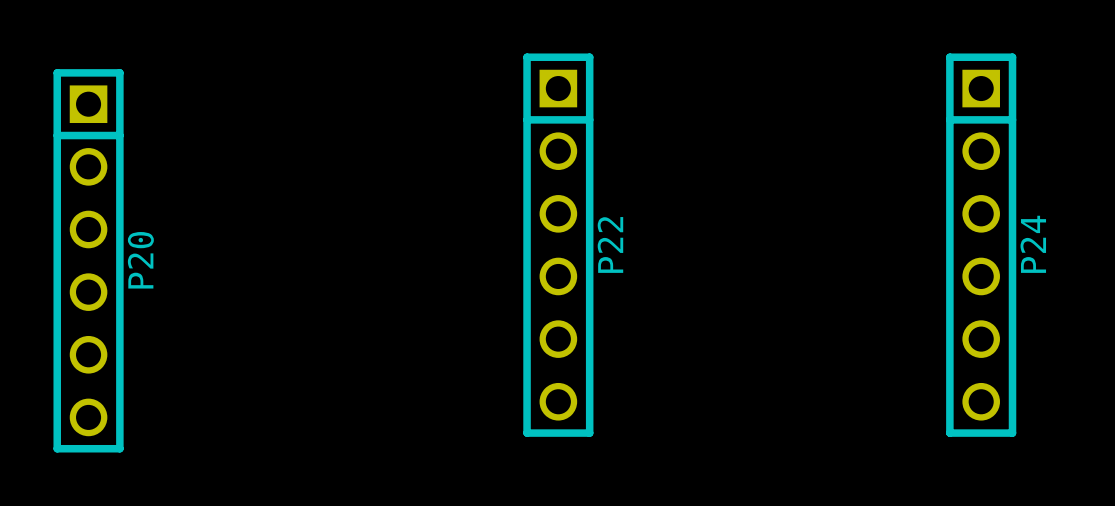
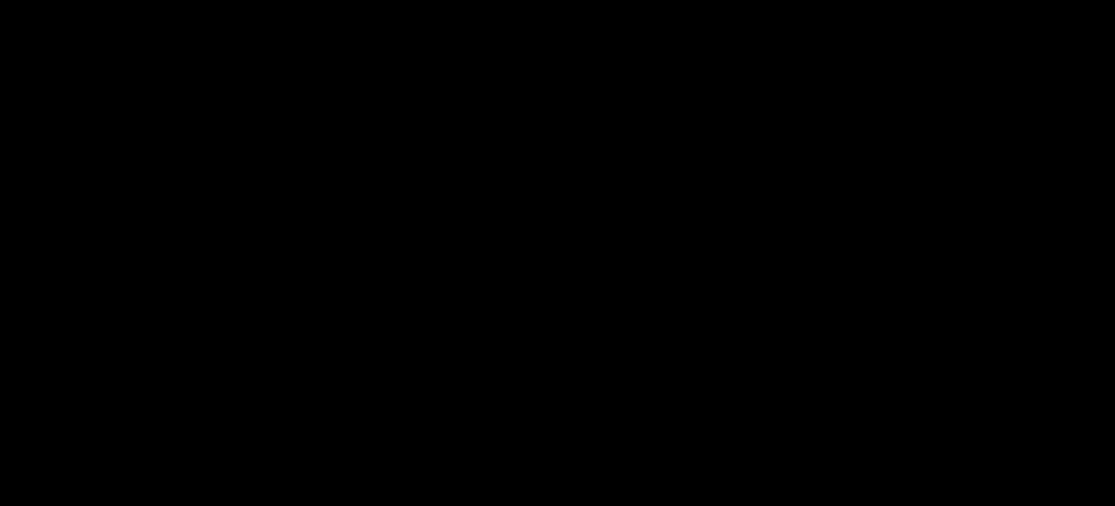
P22: (558, 245) -> none
P24: (981, 245) -> none
P20: (88, 260) -> none

